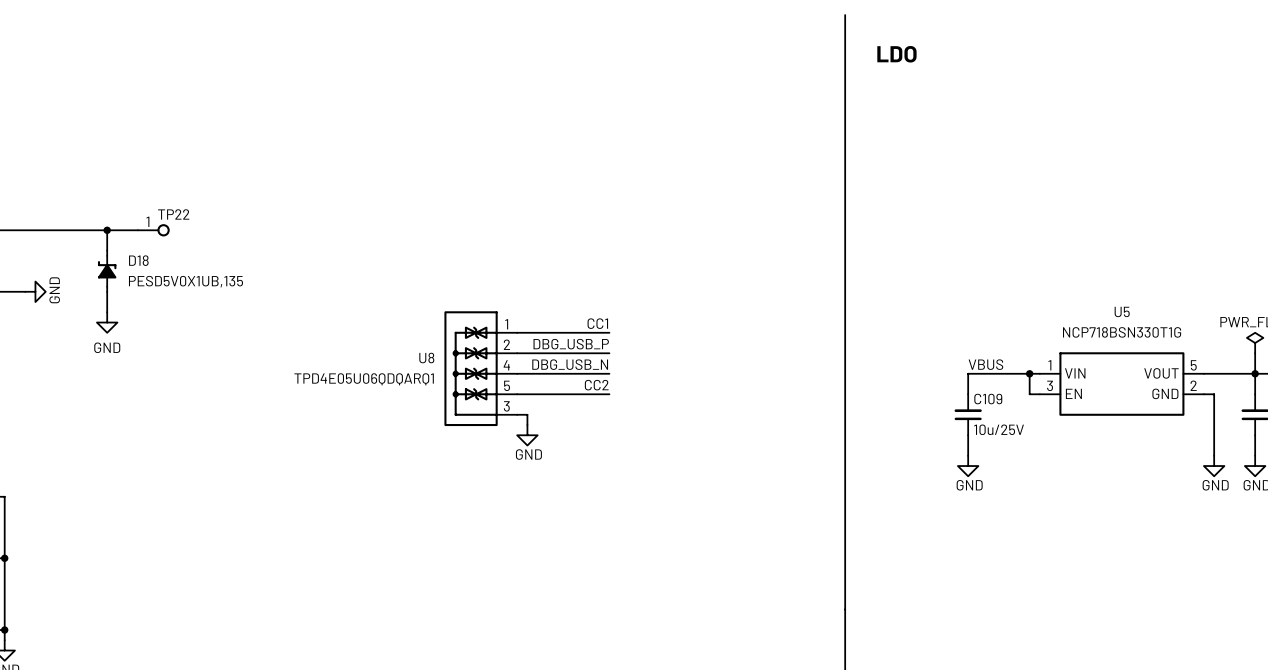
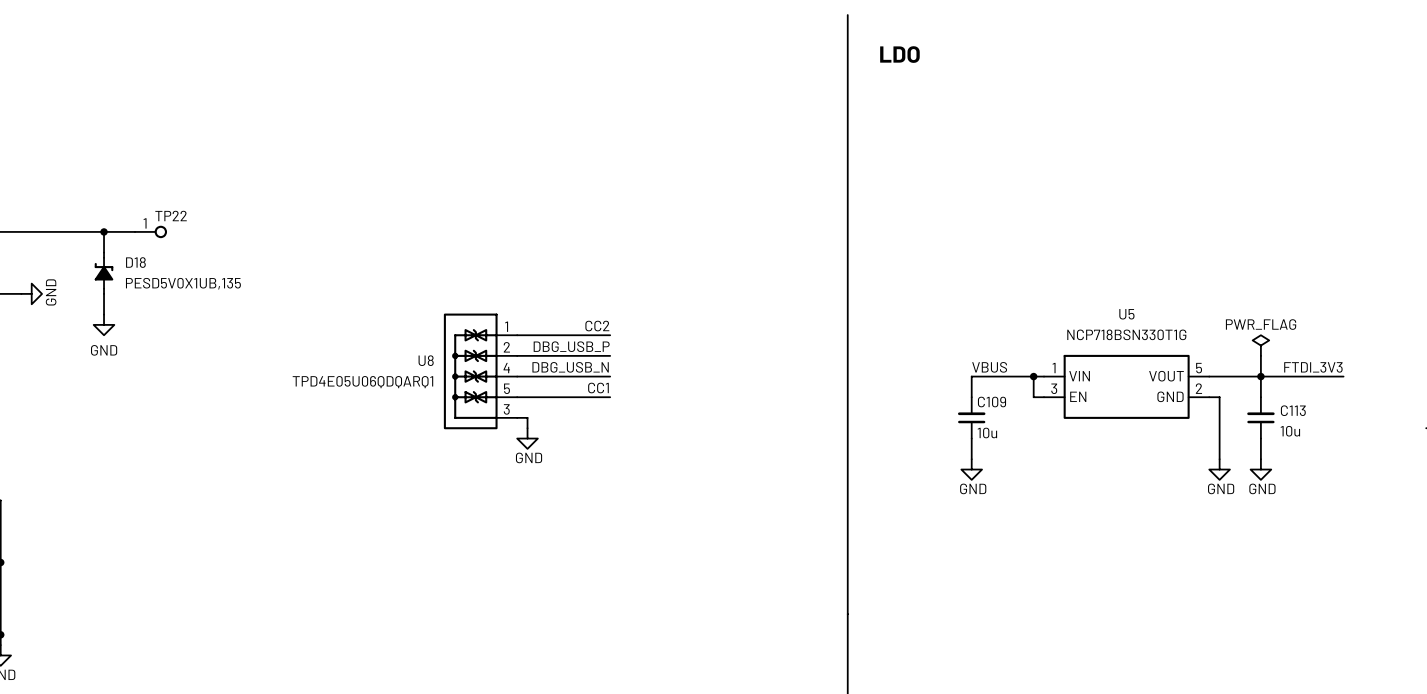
label: CC1 (597, 323) -> CC2 (597, 326)
label: CC2 (596, 385) -> CC1 (598, 388)
C109 text: 10u/25V (999, 429) -> 10u (987, 433)

